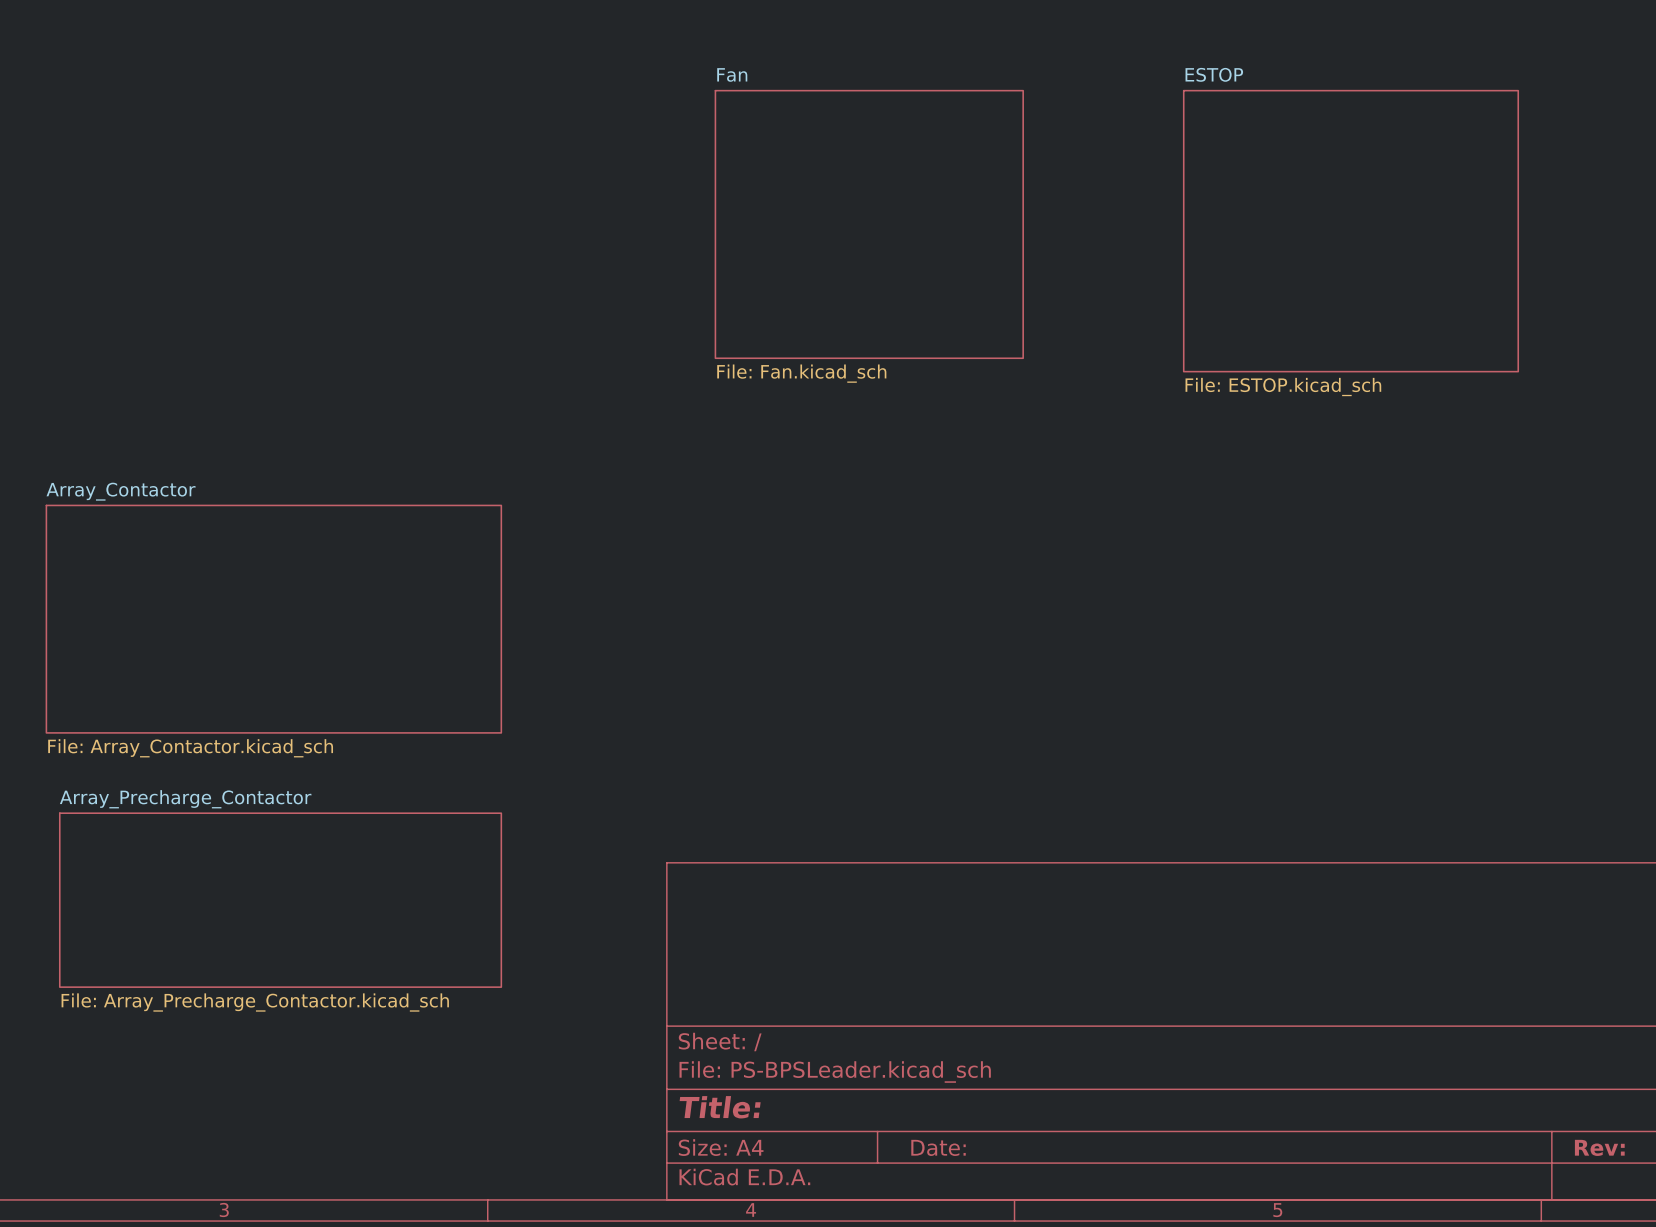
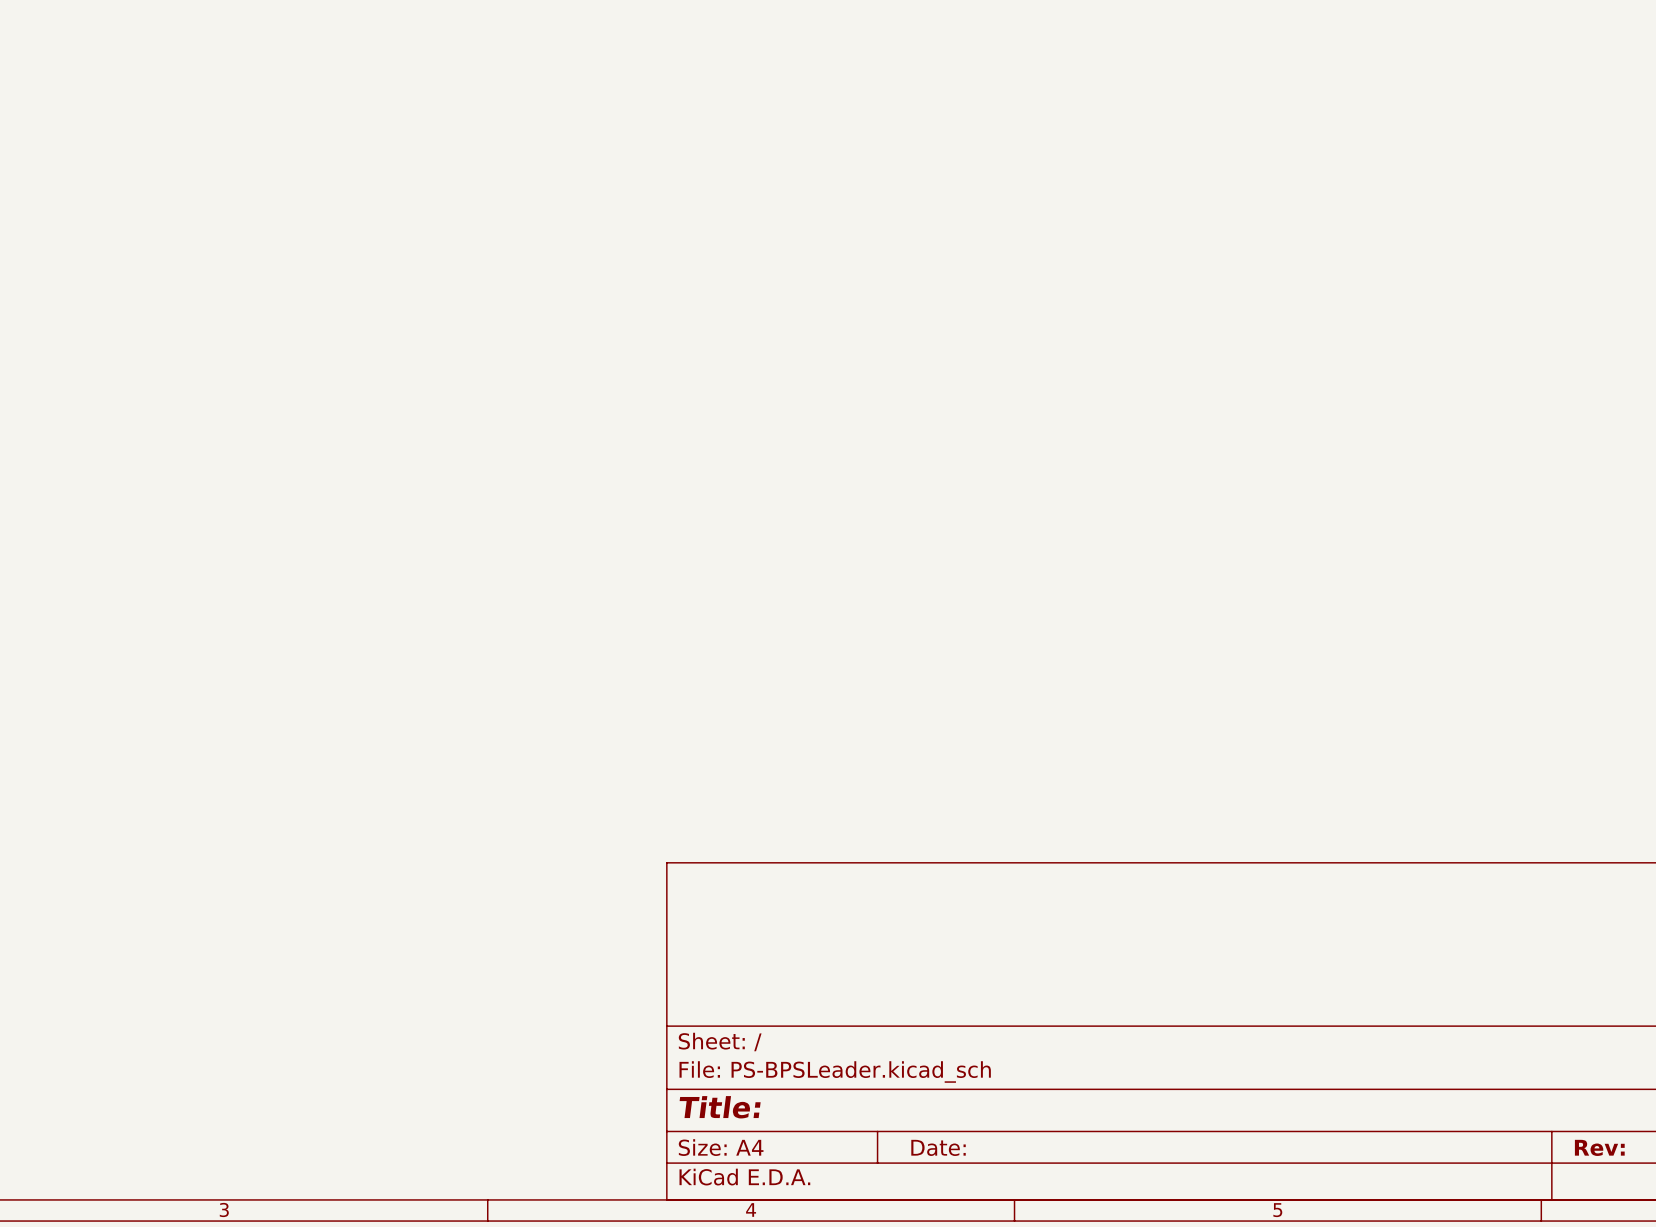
sheet Fan: File: Fan.kicad_sch (869, 224) -> none
sheet ESTOP: File: ESTOP.kicad_sch (1350, 231) -> none
sheet Array_Contactor: File: Array_Contactor.kicad_sch (273, 619) -> none
sheet Array_Precharge_Contactor: File: Array_Precharge_Contactor.kicad_sch (280, 900) -> none

